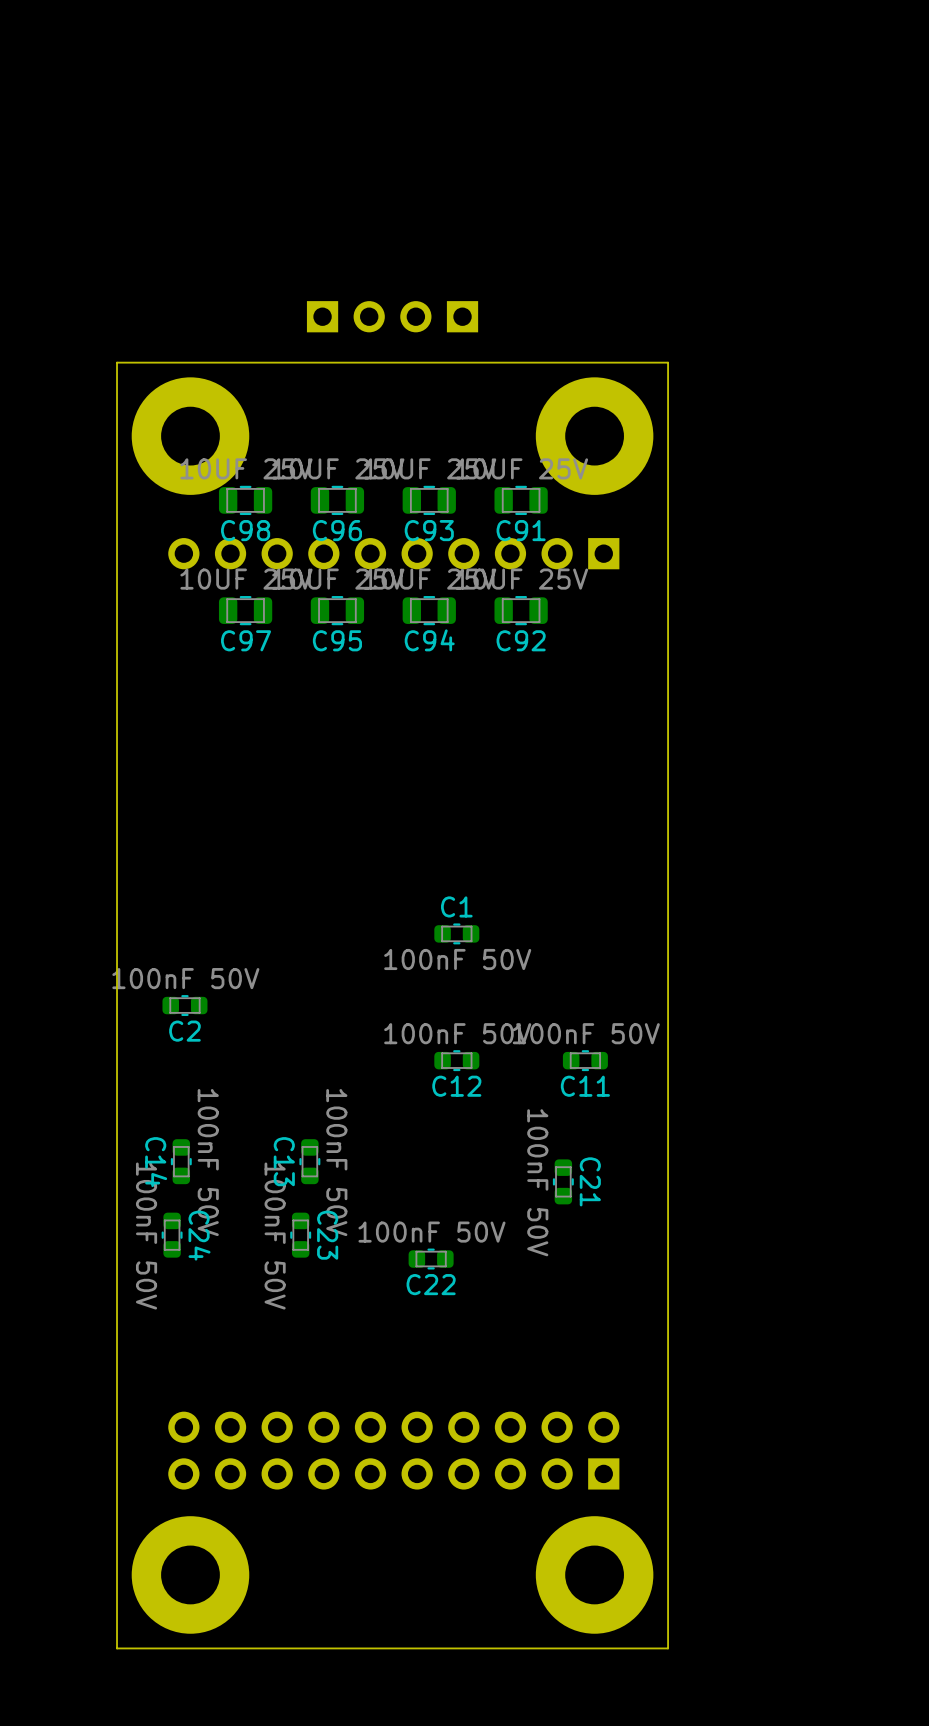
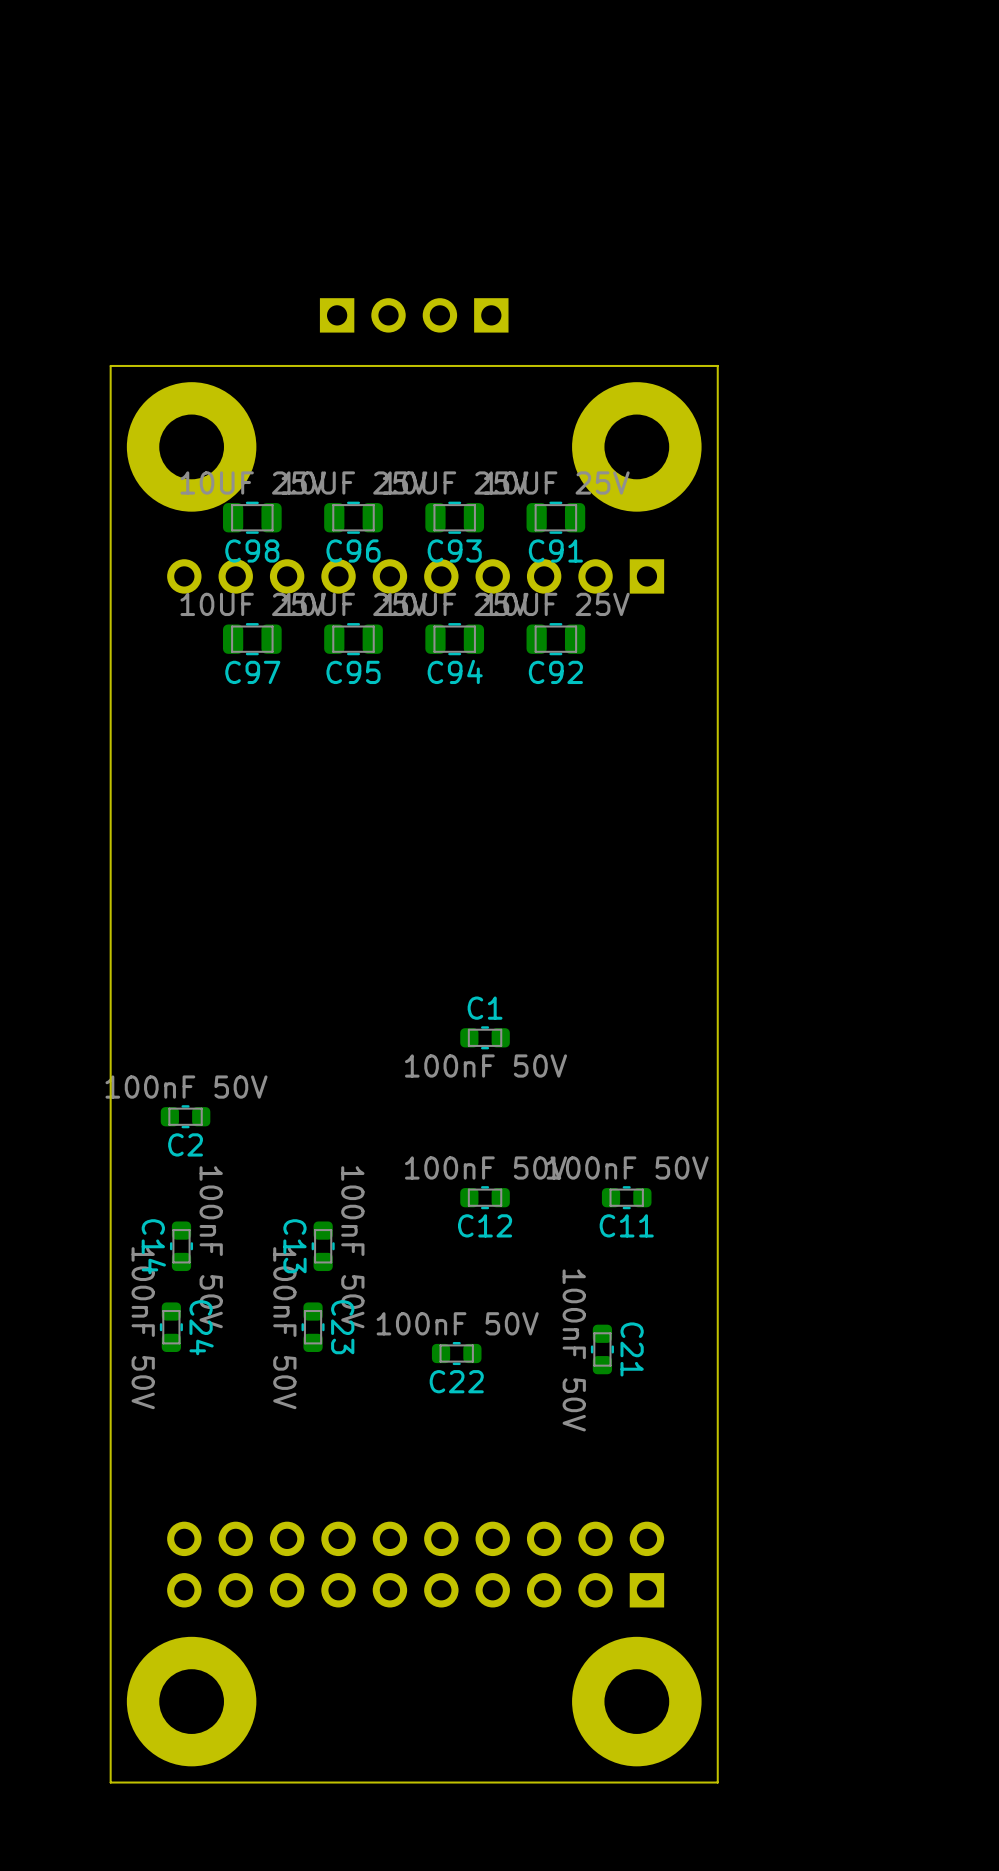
C1 position: (456, 933) -> (485, 1037)
C2 position: (184, 1005) -> (185, 1116)
C12 position: (456, 1060) -> (485, 1197)
C11 position: (585, 1060) -> (626, 1197)
C21 position: (563, 1181) -> (602, 1349)

